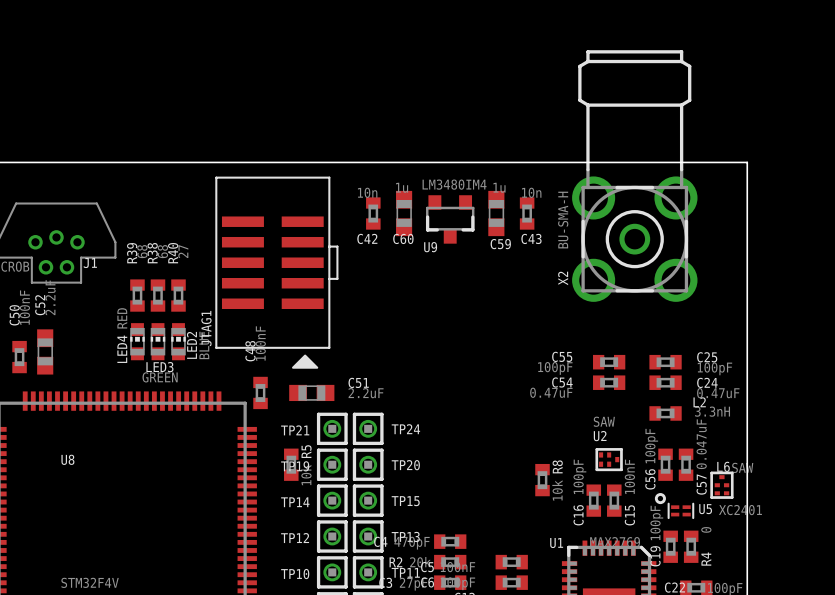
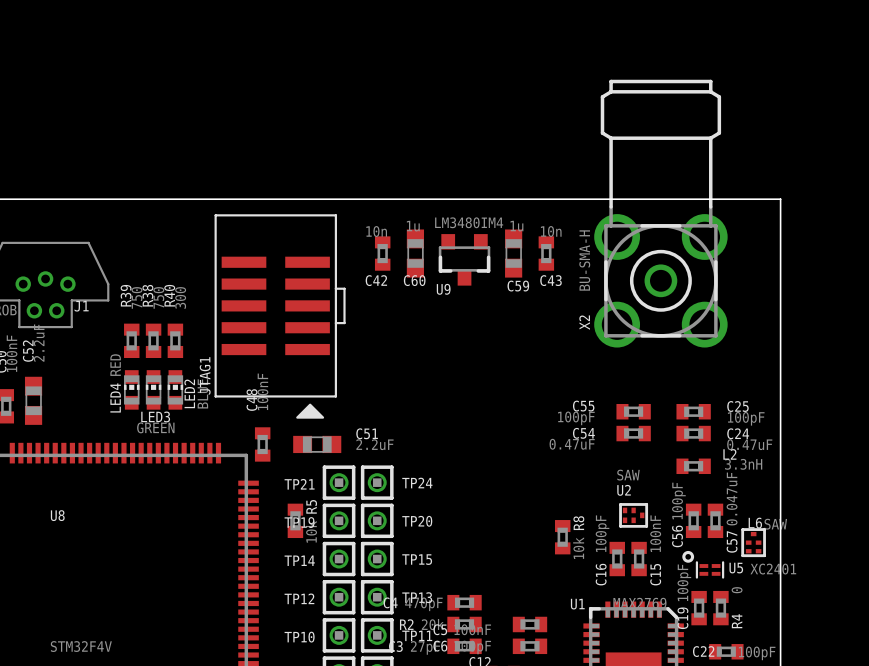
R39 value: 68 (142, 251) -> 750 (137, 297)
R38 value: 68 (162, 251) -> 750 (158, 297)
R40 value: 27 (183, 251) -> 300 (180, 297)

